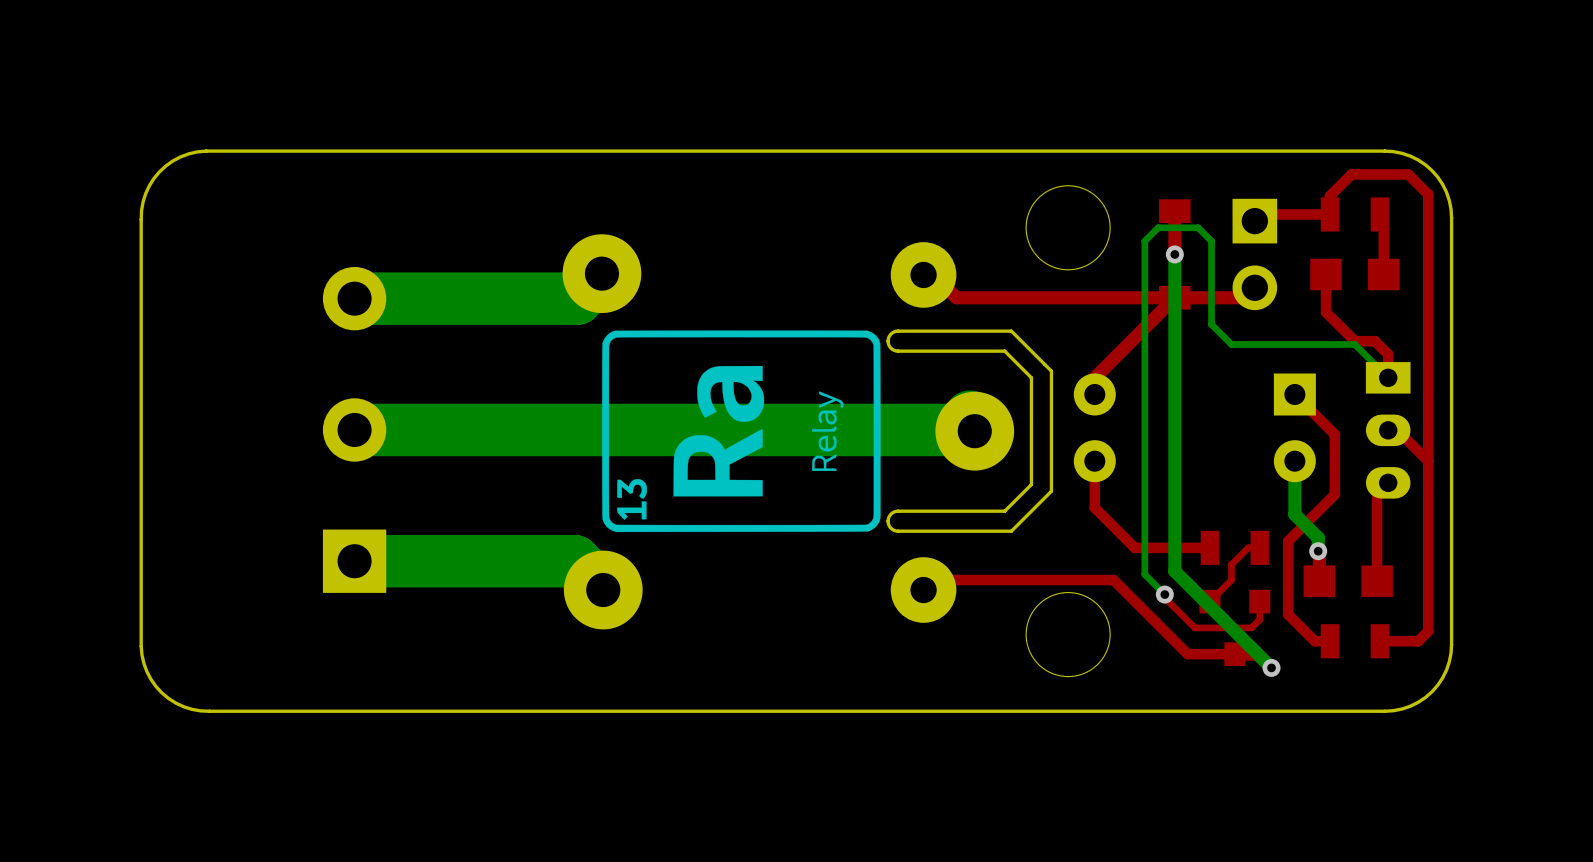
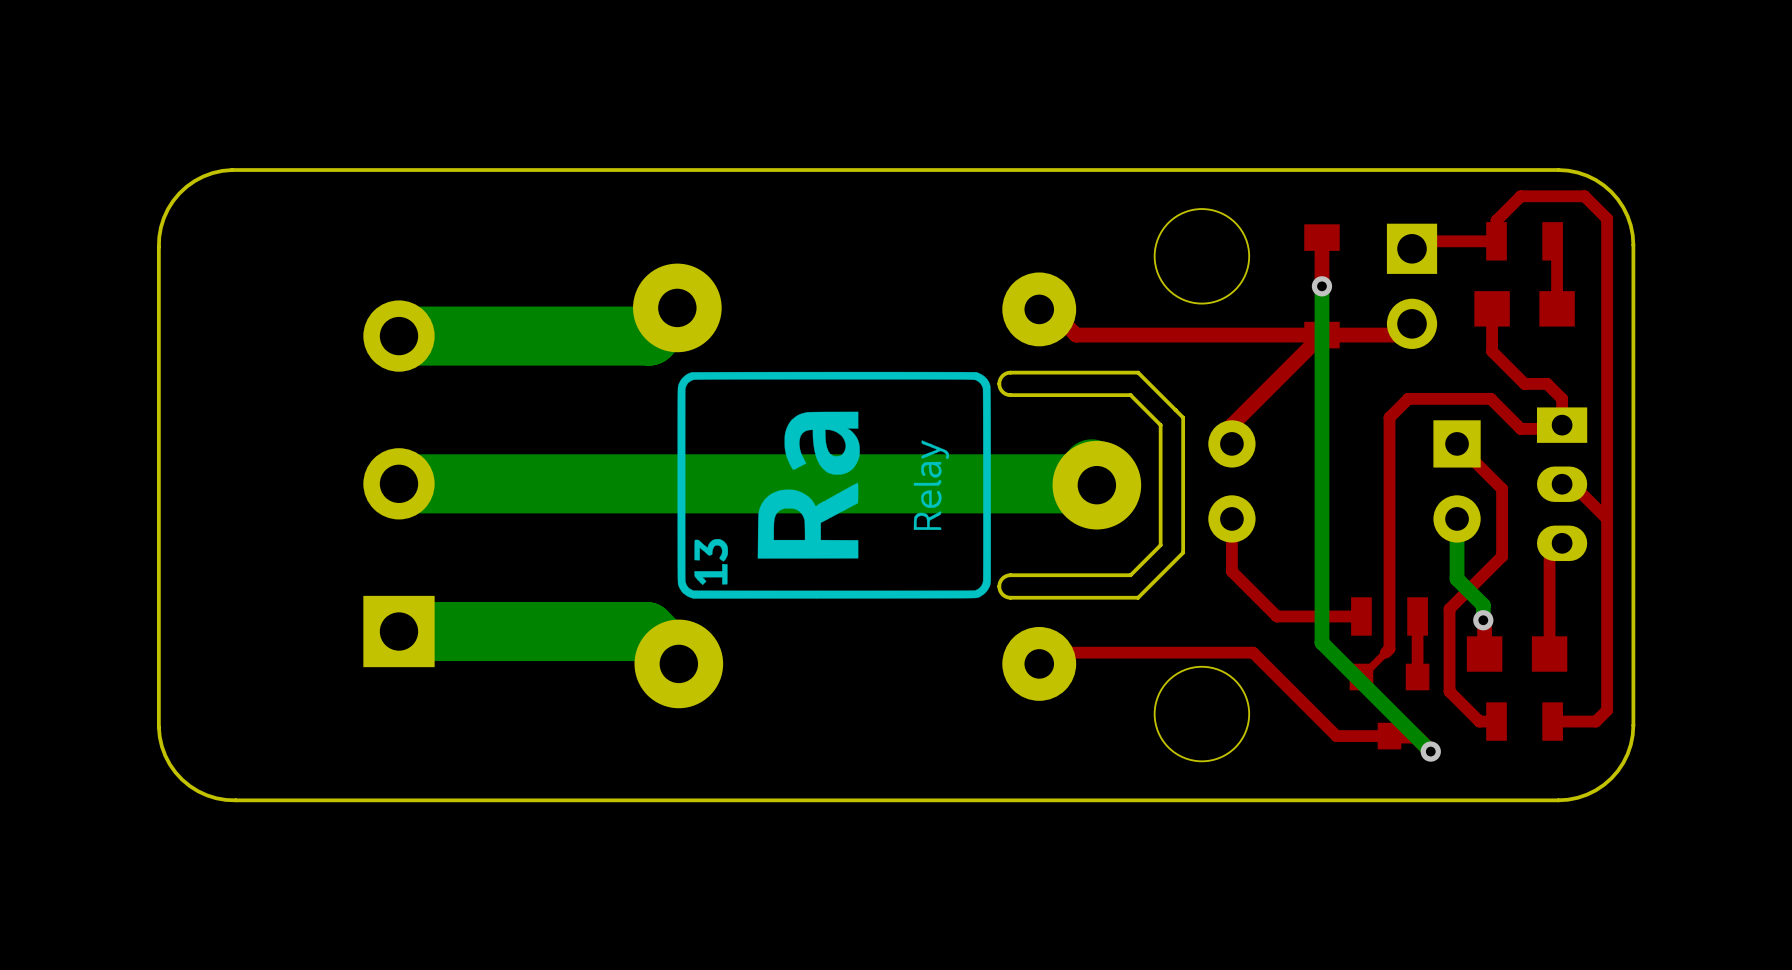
bottom track: (1388, 377) (1354, 344) (1231, 344) (1211, 324) (1211, 241) (1198, 227) (1158, 227) (1144, 241) (1144, 574) (1164, 594) -> none
top track: none -> (1562, 428) (1520, 428) (1490, 398) (1408, 398) (1389, 417) (1389, 648) (1385, 652)
top track: (1259, 547) (1248, 547) (1231, 564) (1231, 580) -> (1417, 616) (1417, 677)
top track: (1164, 594) (1164, 597) (1194, 627) (1251, 627) (1259, 619) (1259, 601) -> none
via: (1164, 594) -> none

